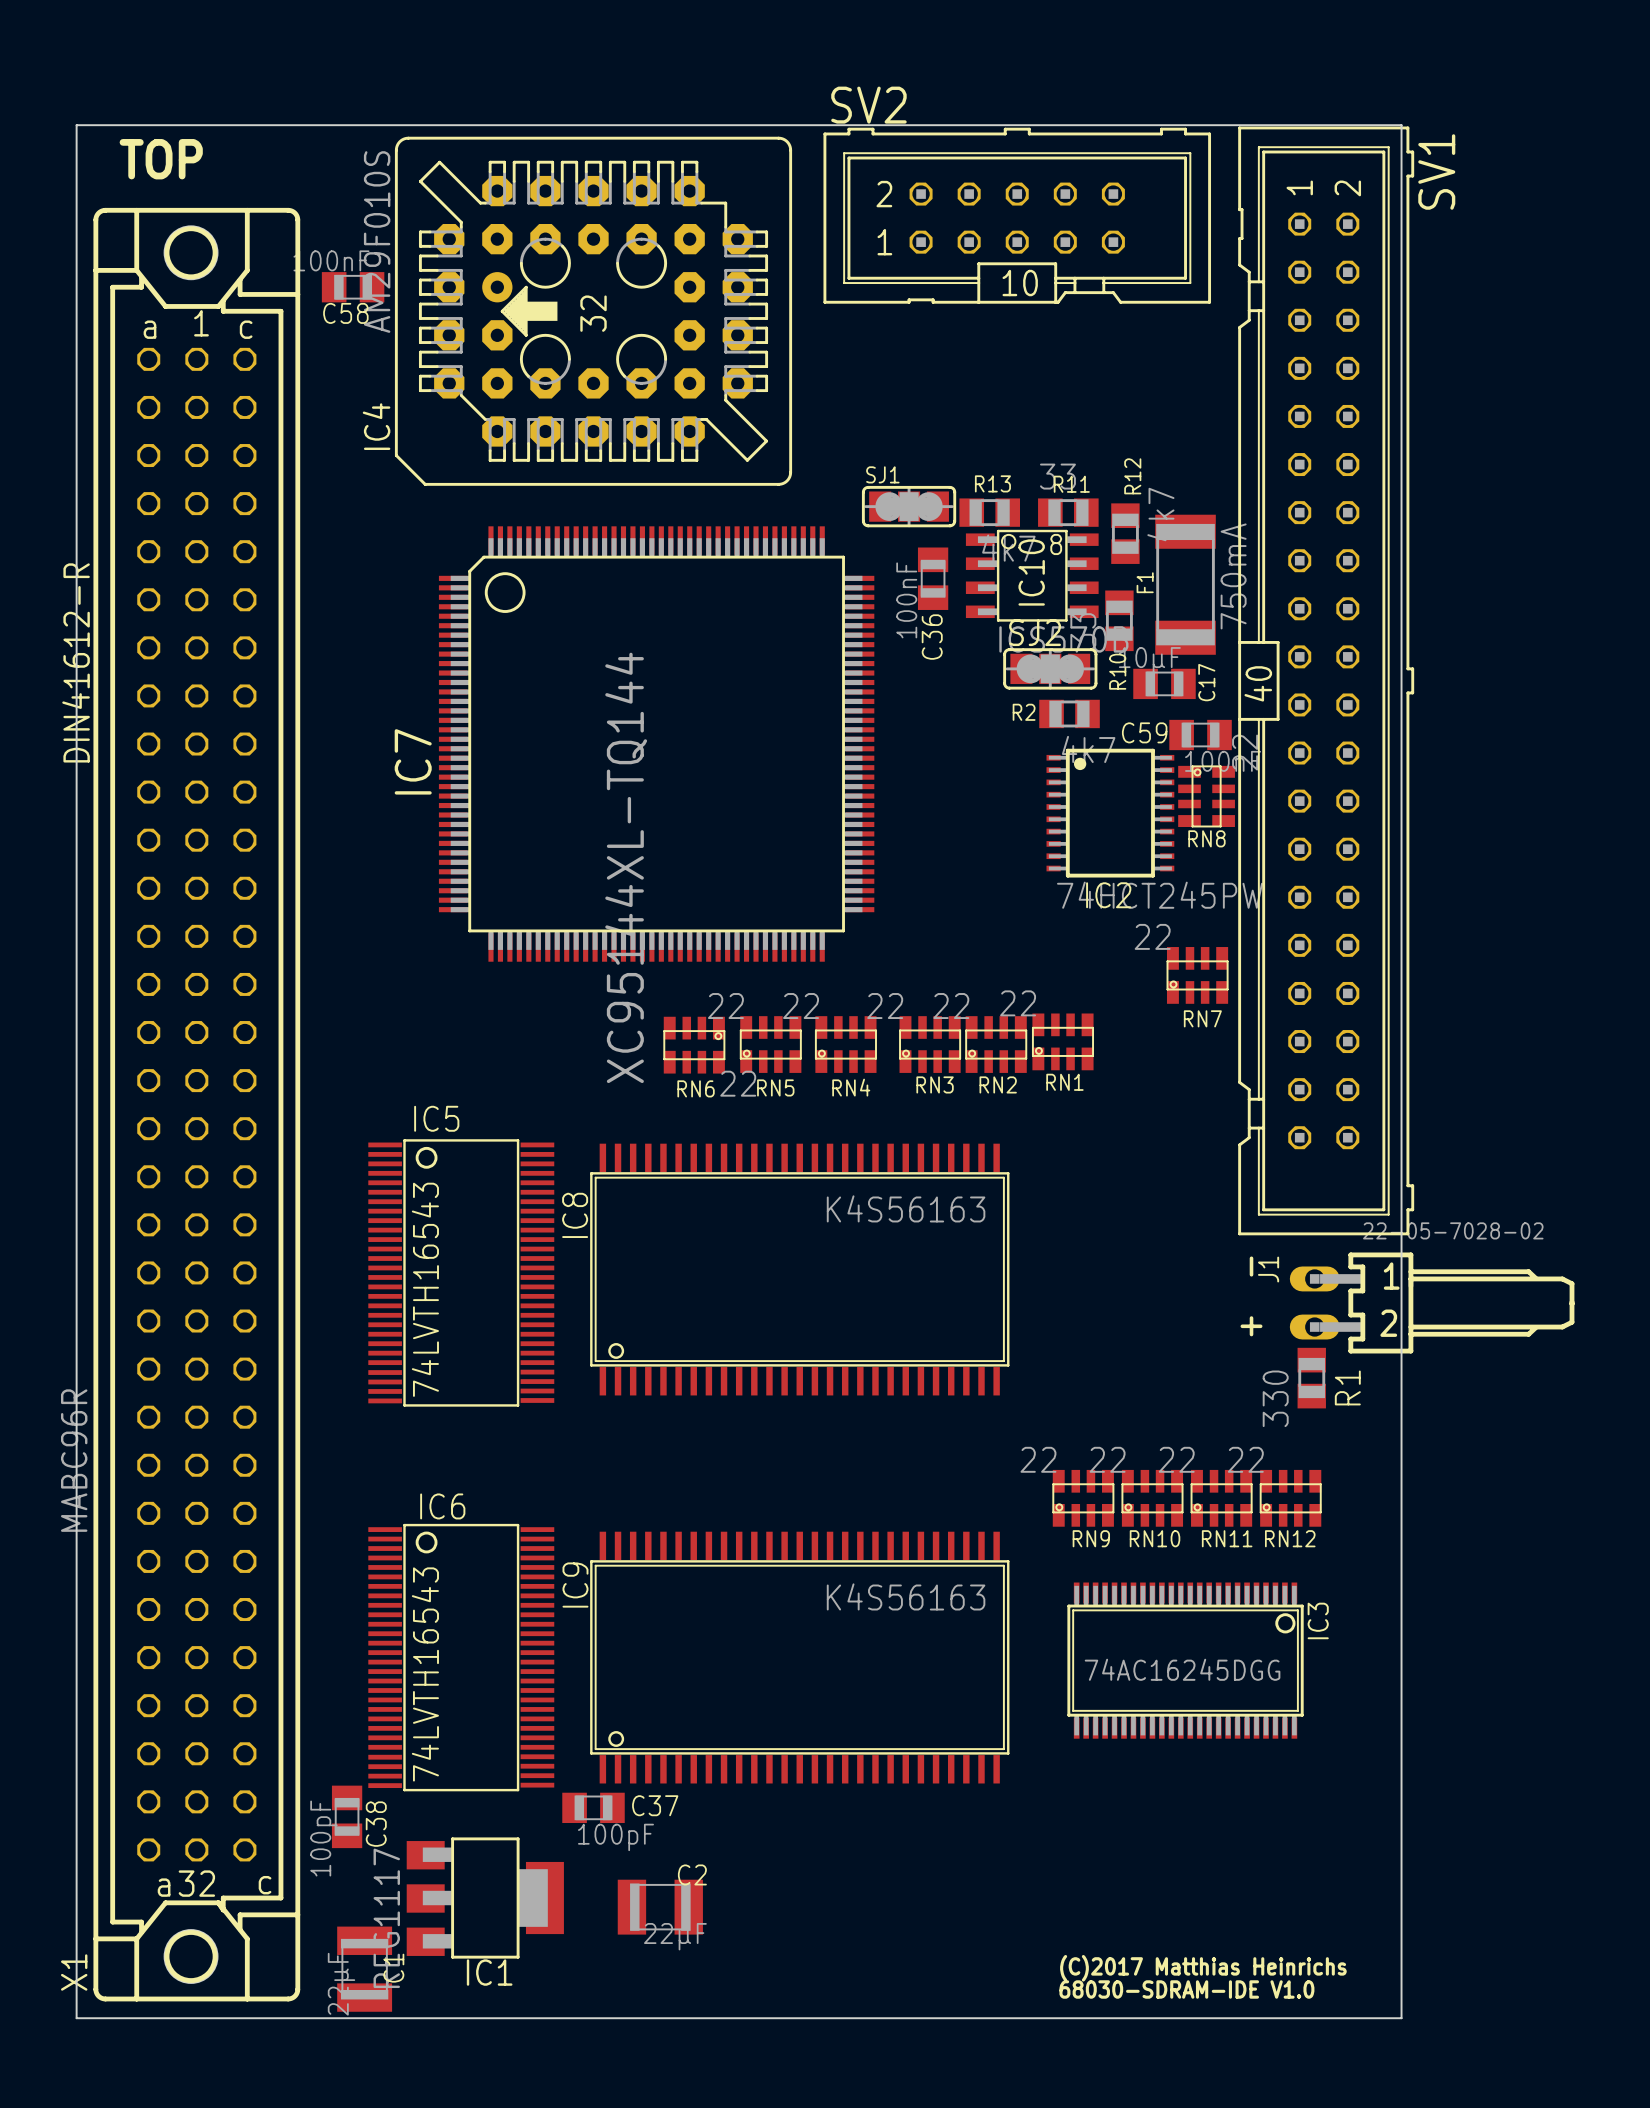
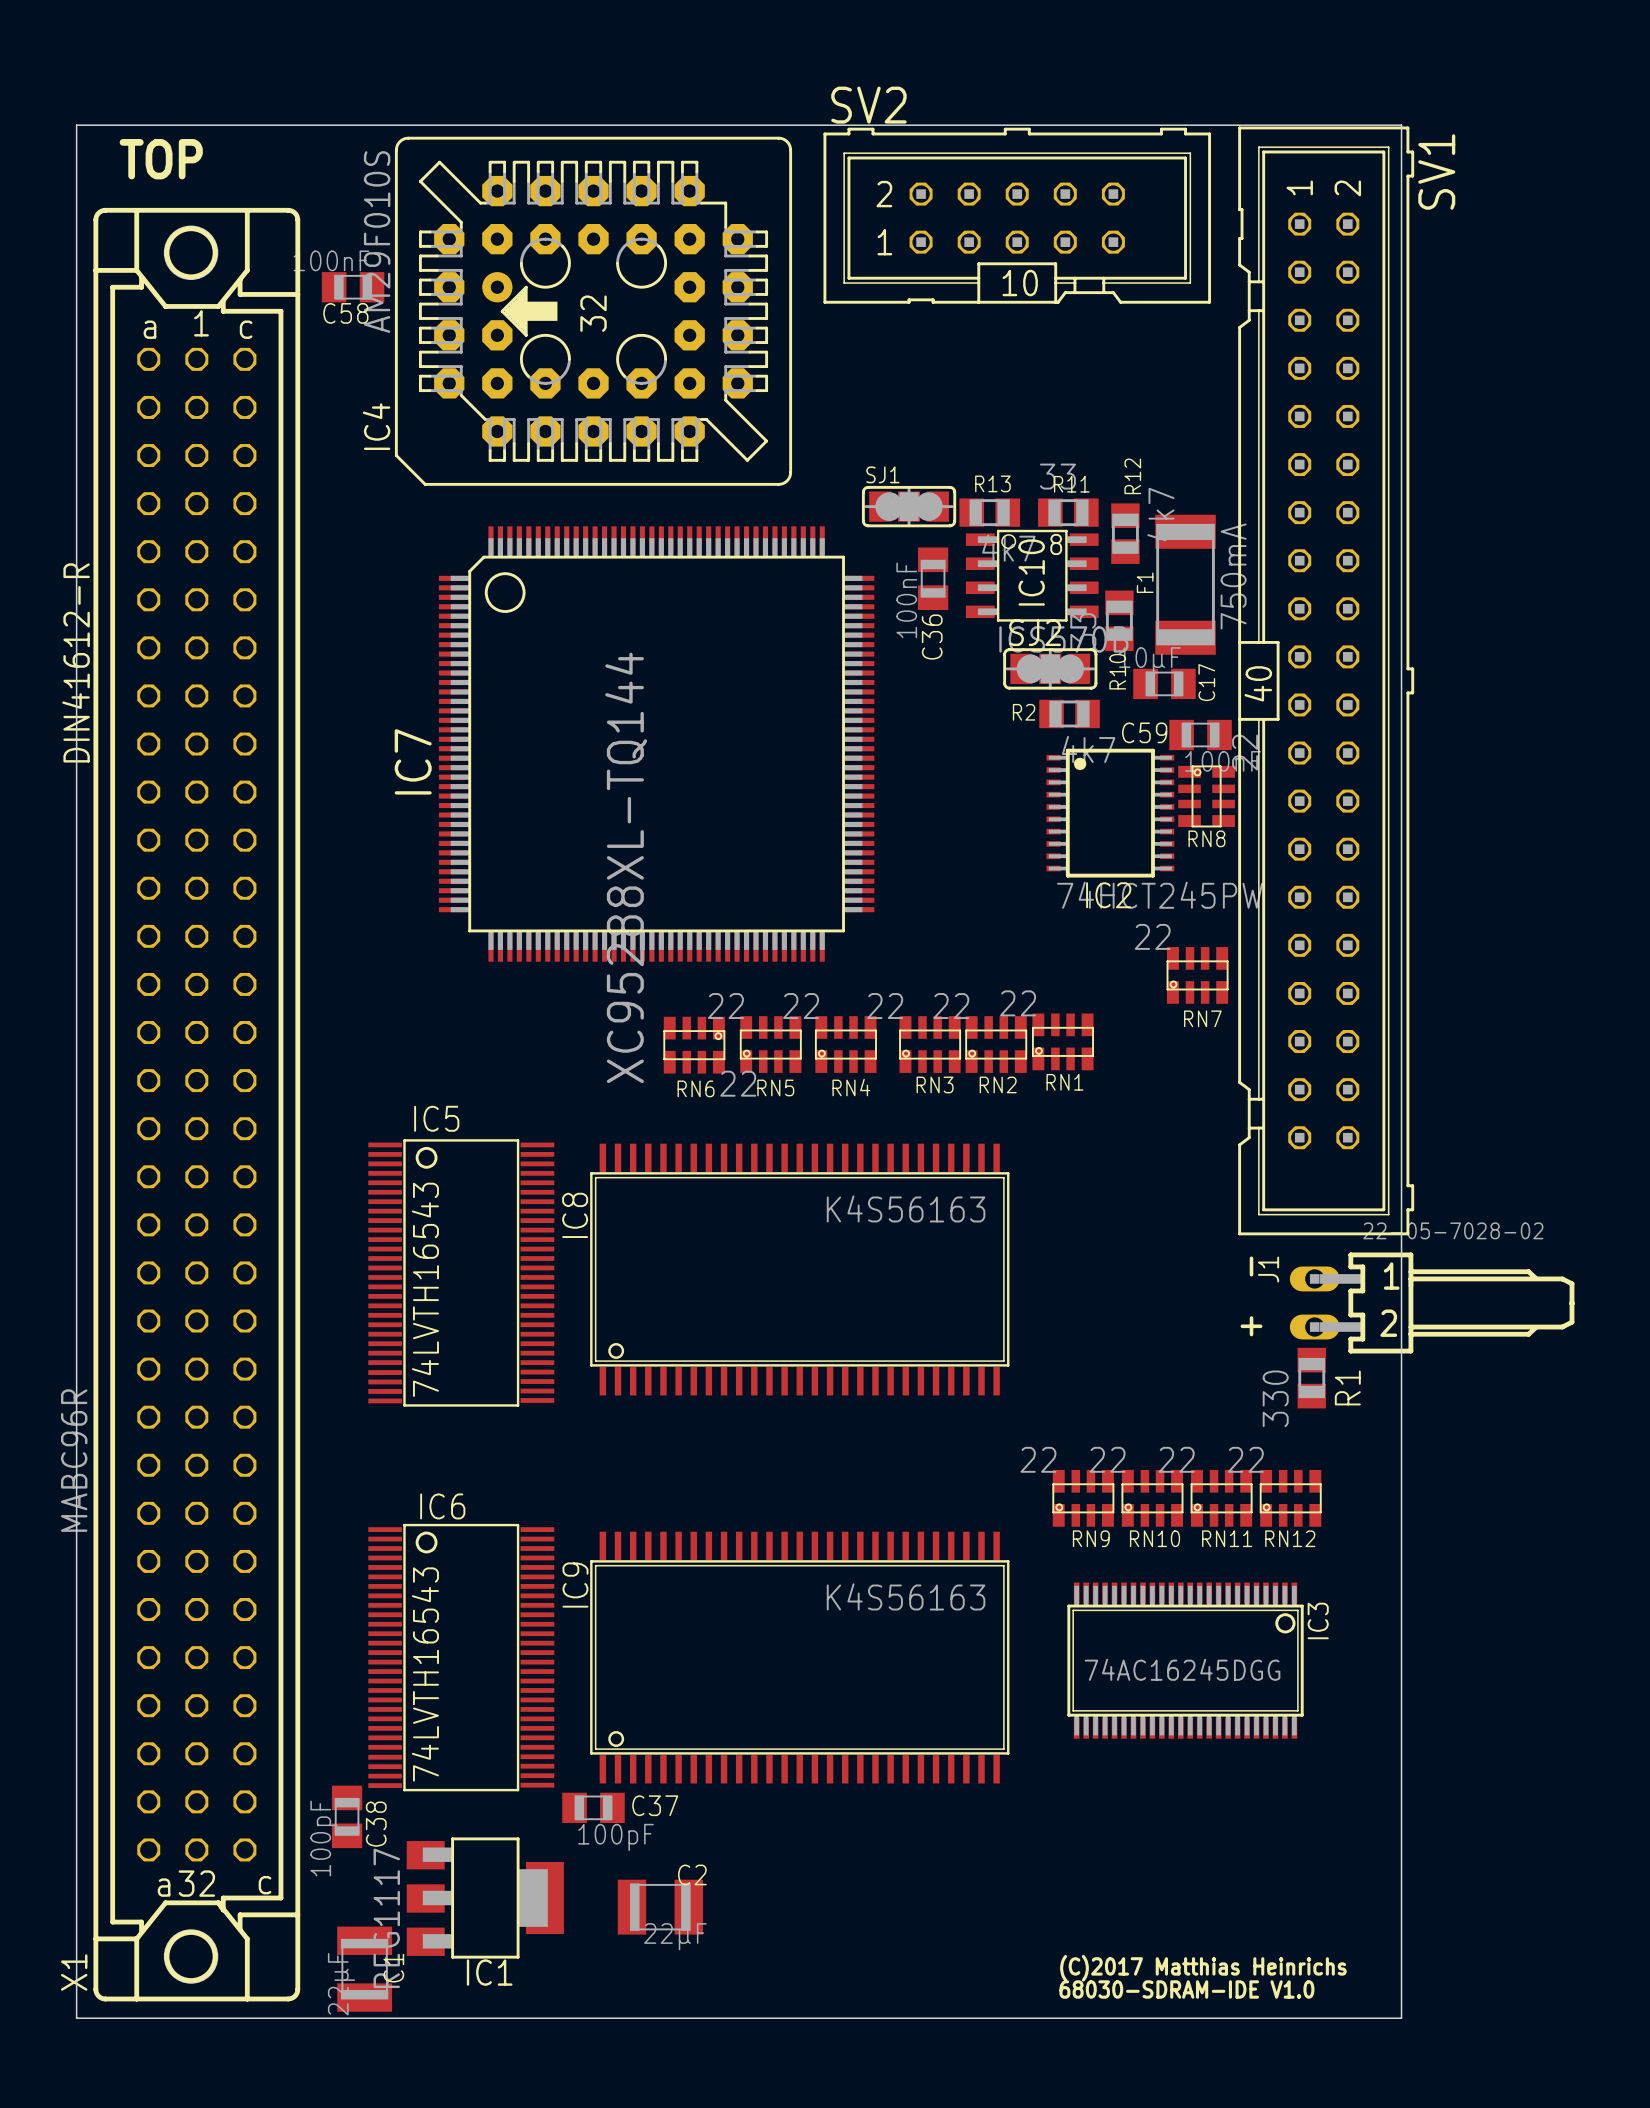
IC7 value: XC95144XL-TQ144 (626, 867) -> XC95288XL-TQ144 (626, 867)

